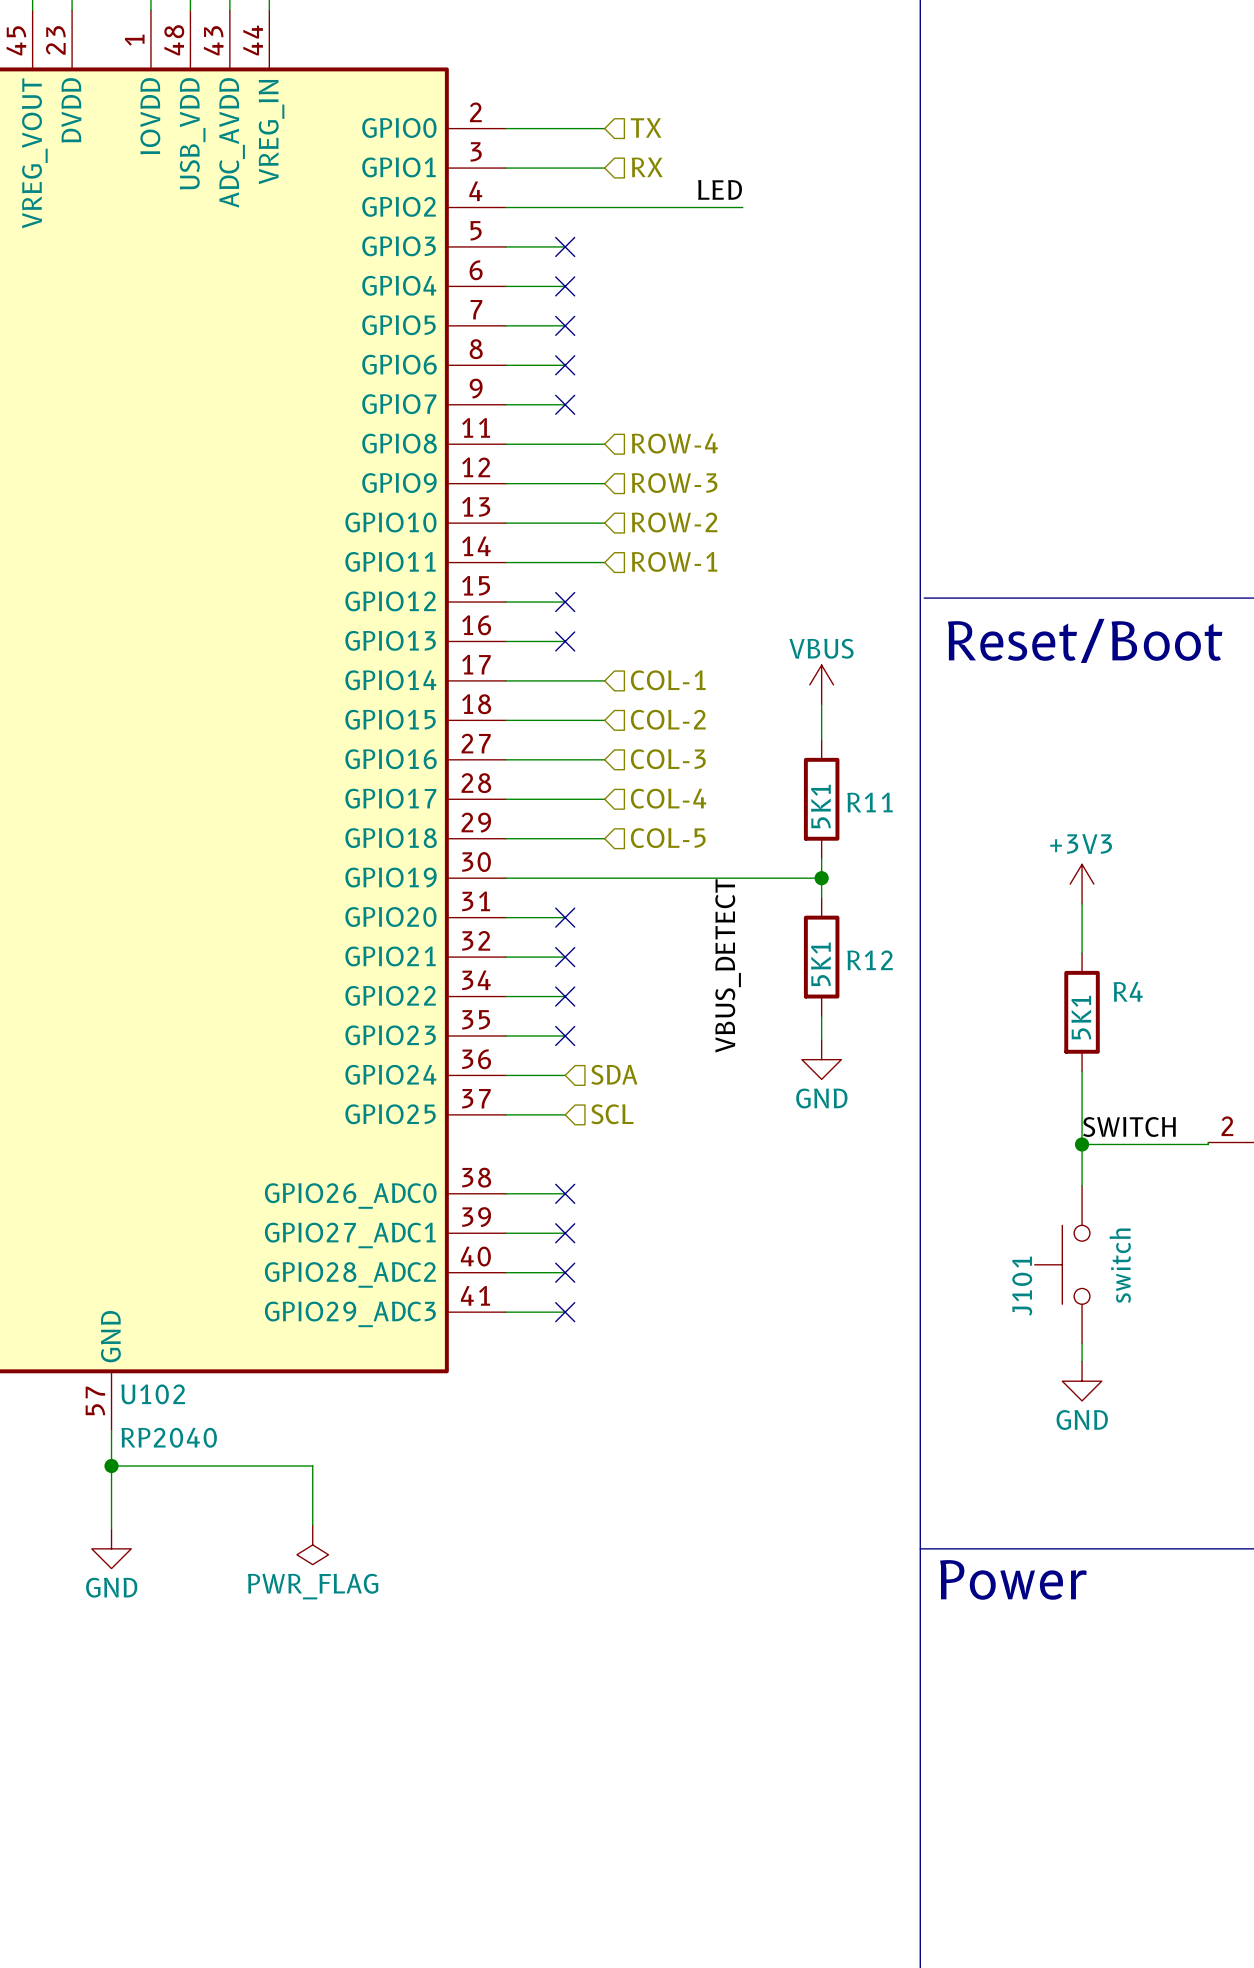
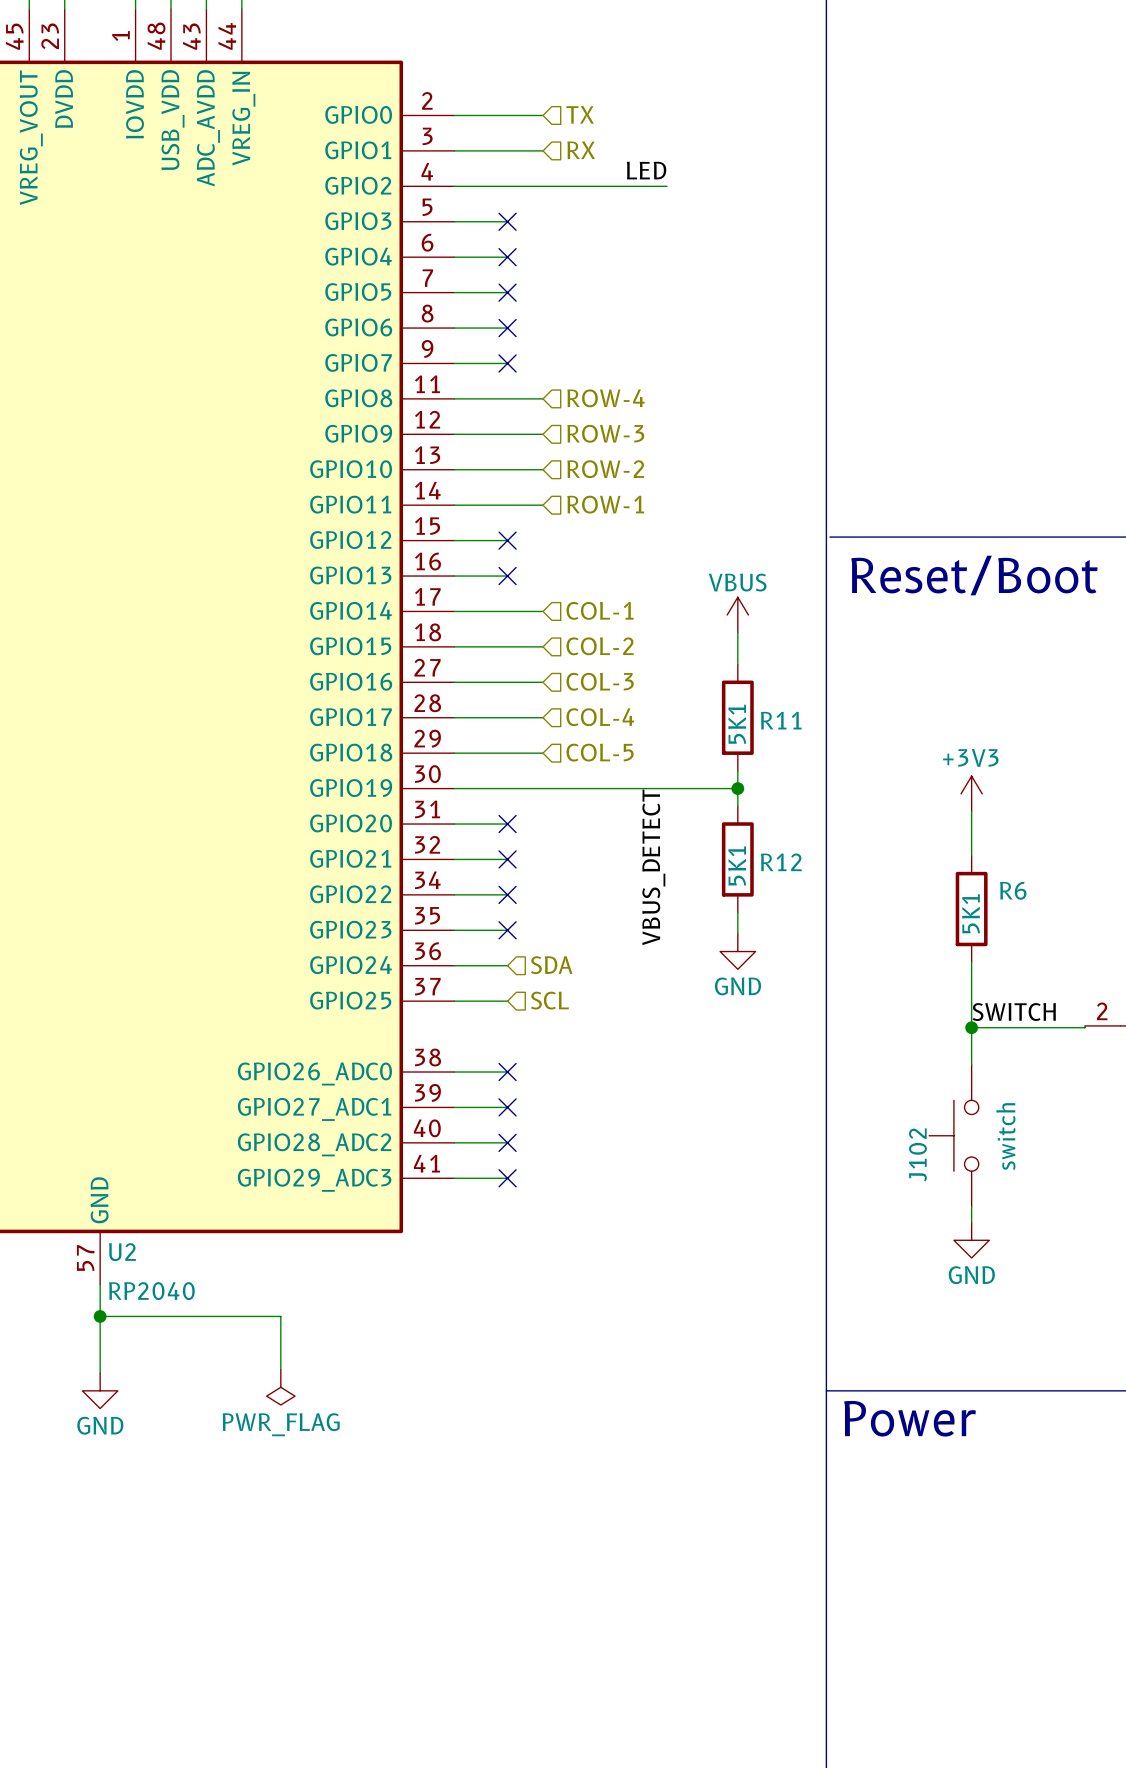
R4 name: R4 (1128, 991) -> R6 (1013, 890)
J101 name: J101 (1022, 1286) -> J102 (917, 1154)
U102 name: U102 (153, 1394) -> U2 (122, 1252)

